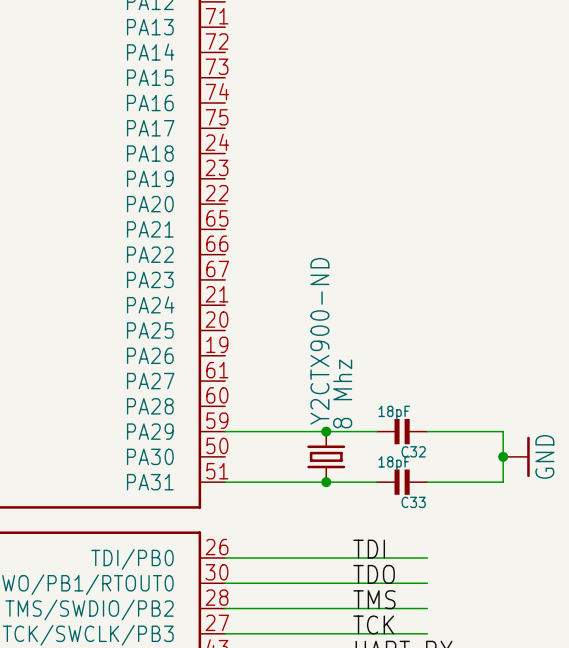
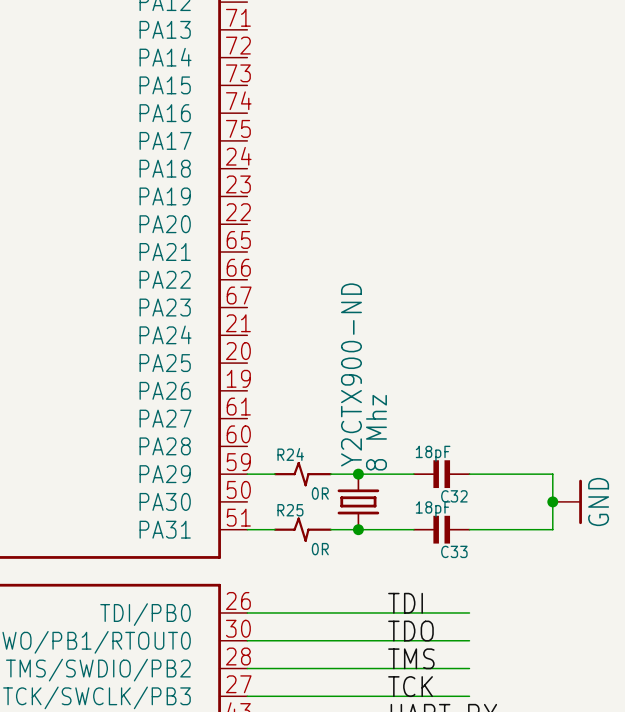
R24: none -> 0R (302, 474)
R25: none -> 0R (302, 529)

